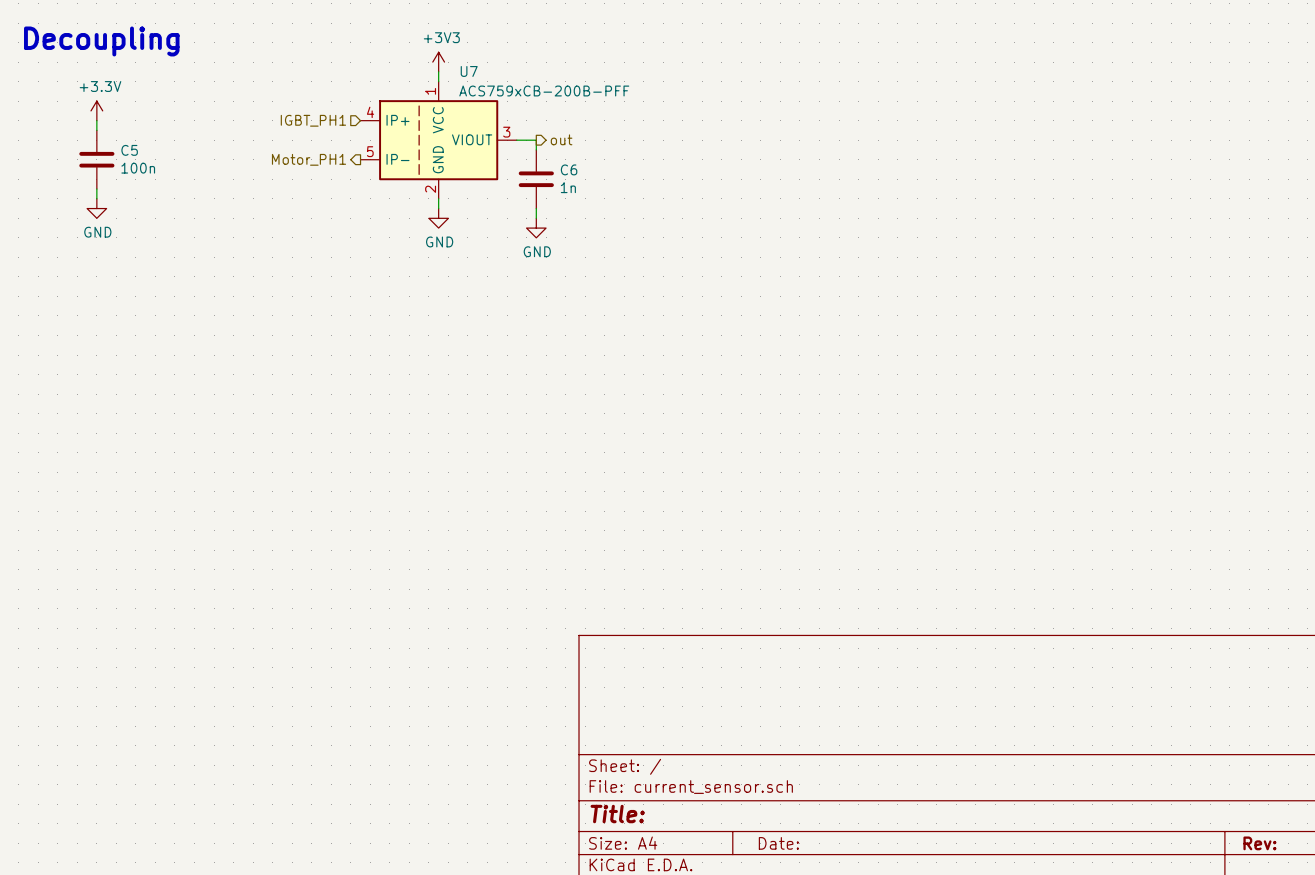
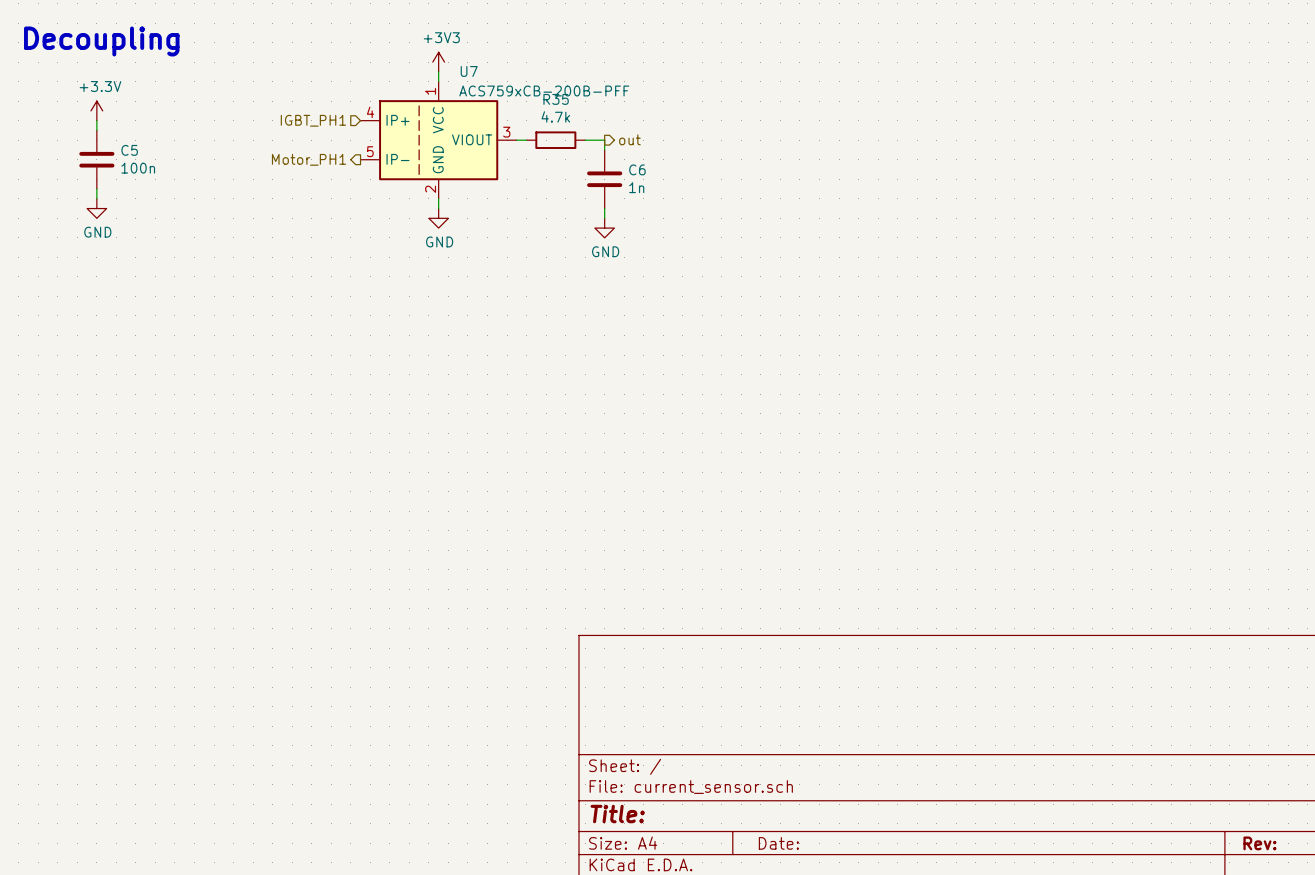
hierarchical label position: out (561, 139) -> out (629, 139)
R35: none -> 4.7k (555, 140)
wire: none -> (585, 140) (604, 140) (604, 149)
C6 position: (536, 179) -> (604, 179)
wire: (536, 208) (536, 218) -> (604, 208) (604, 218)
power symbol position: GND (536, 228) -> GND (604, 228)

